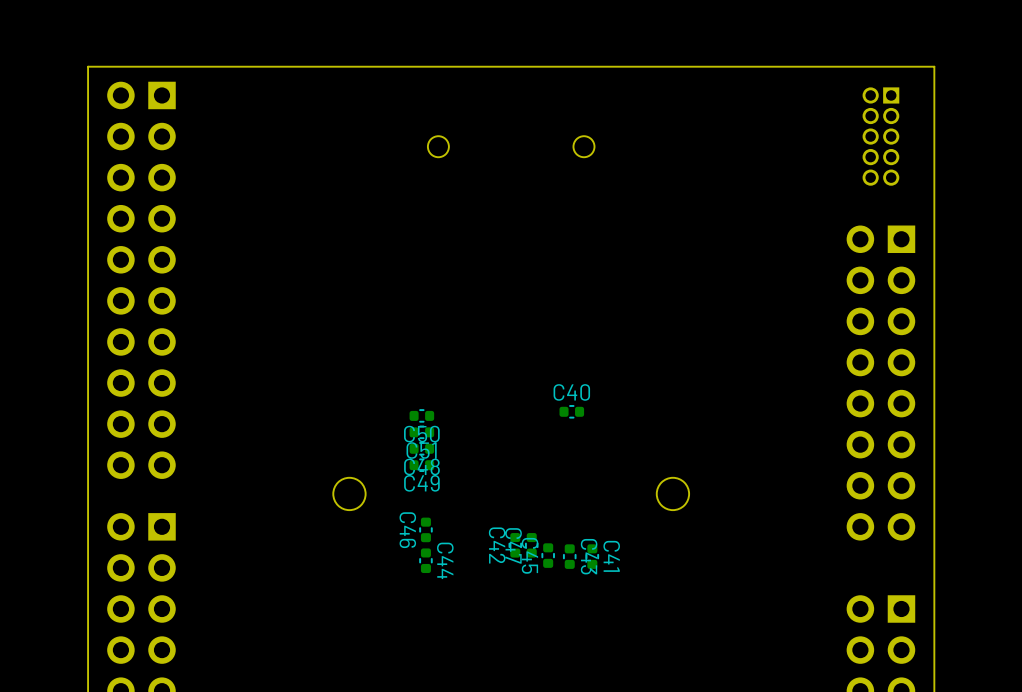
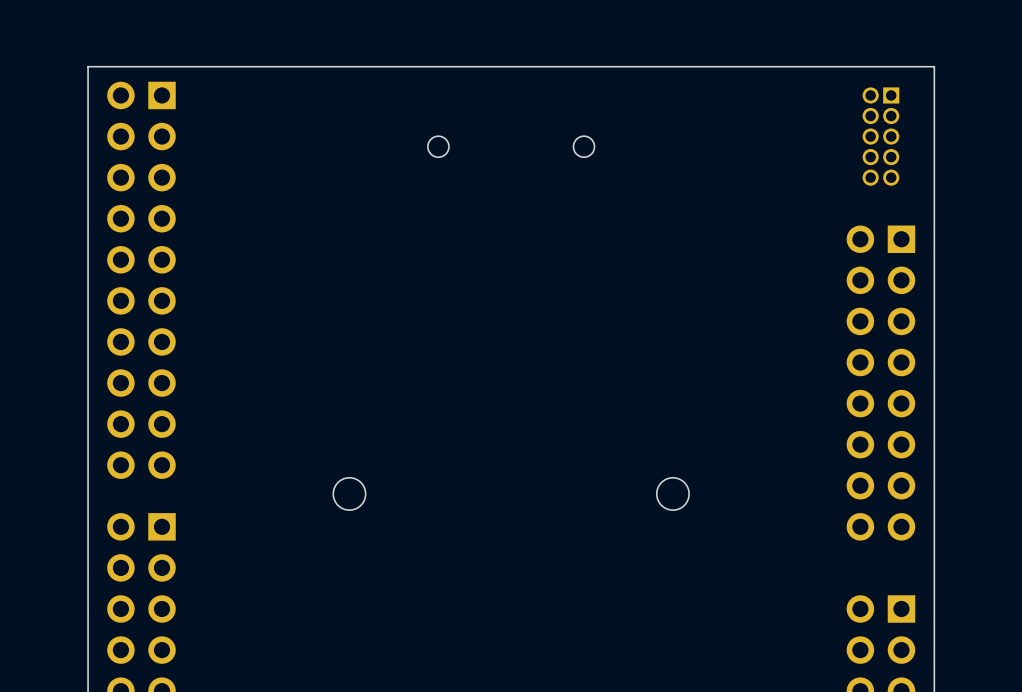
C40: (571, 411) -> none
C50: (421, 415) -> none
C51: (421, 432) -> none
C48: (421, 448) -> none
C49: (421, 465) -> none
C46: (425, 529) -> none
C42: (515, 545) -> none
C47: (531, 545) -> none
C45: (548, 555) -> none
C43: (569, 556) -> none
C41: (592, 556) -> none
C44: (425, 560) -> none

